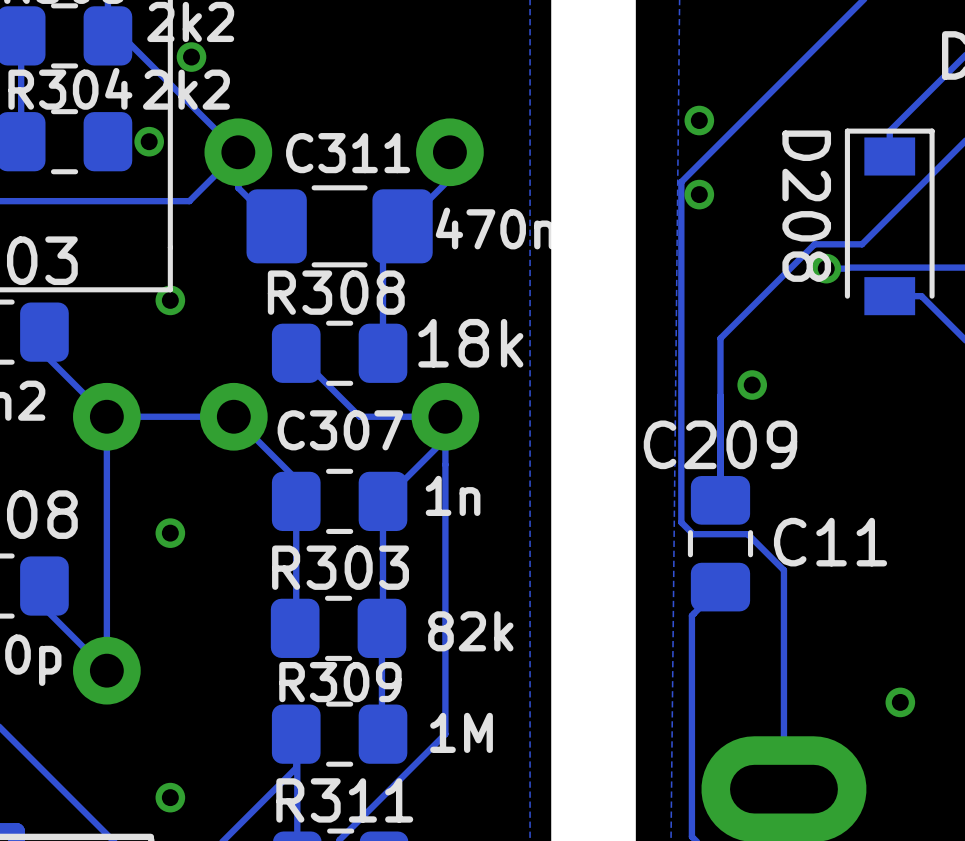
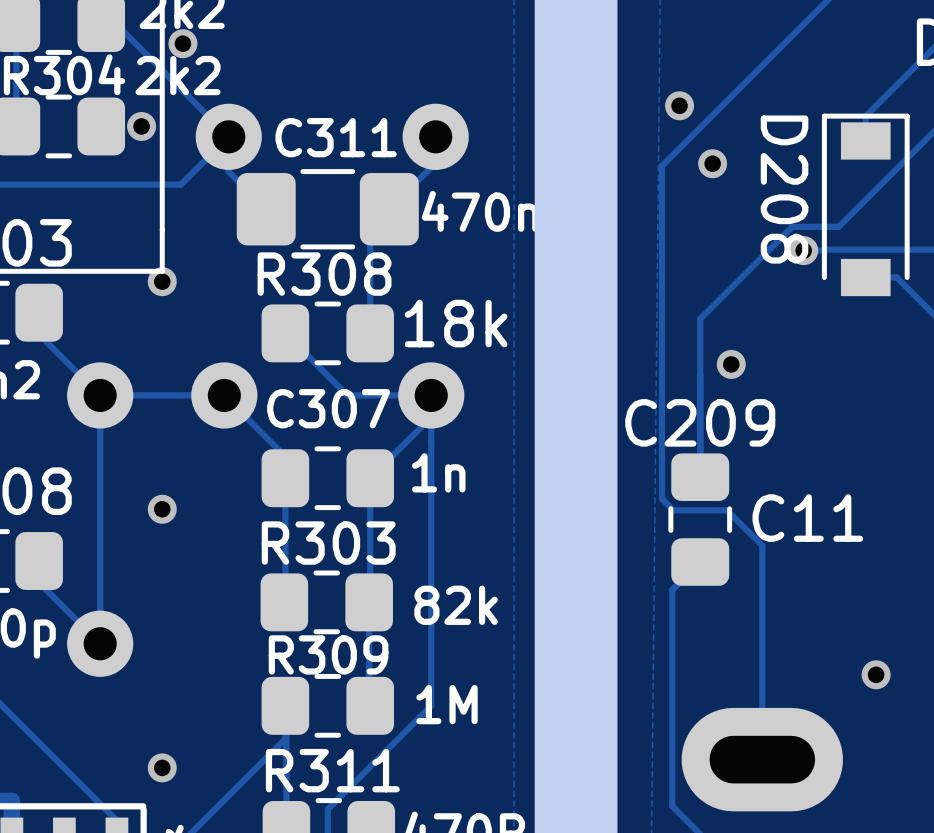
via position: (699, 194) -> (712, 163)

